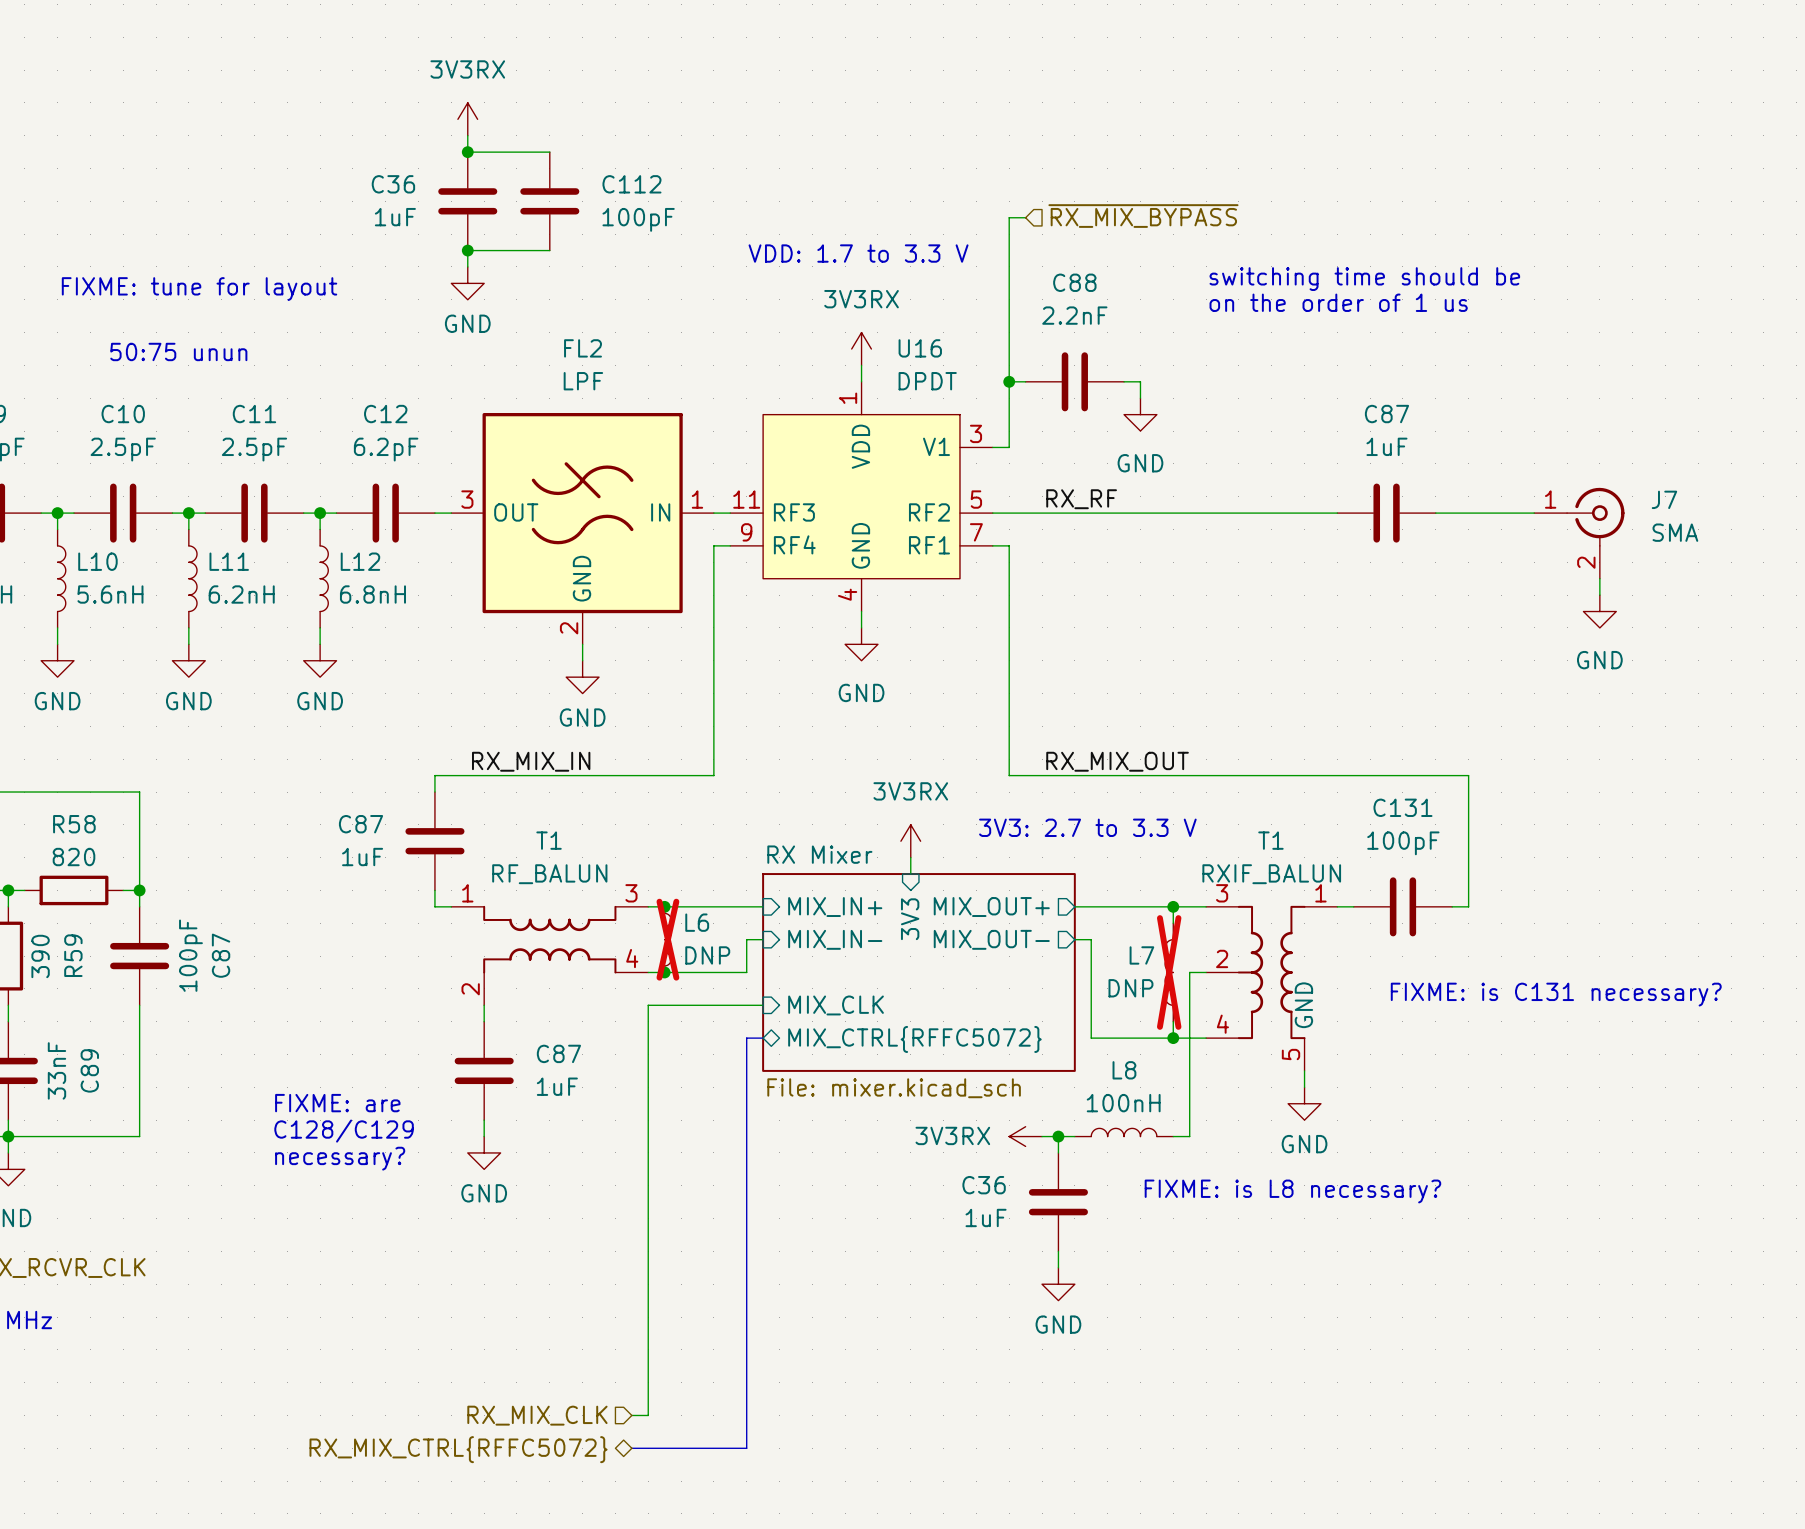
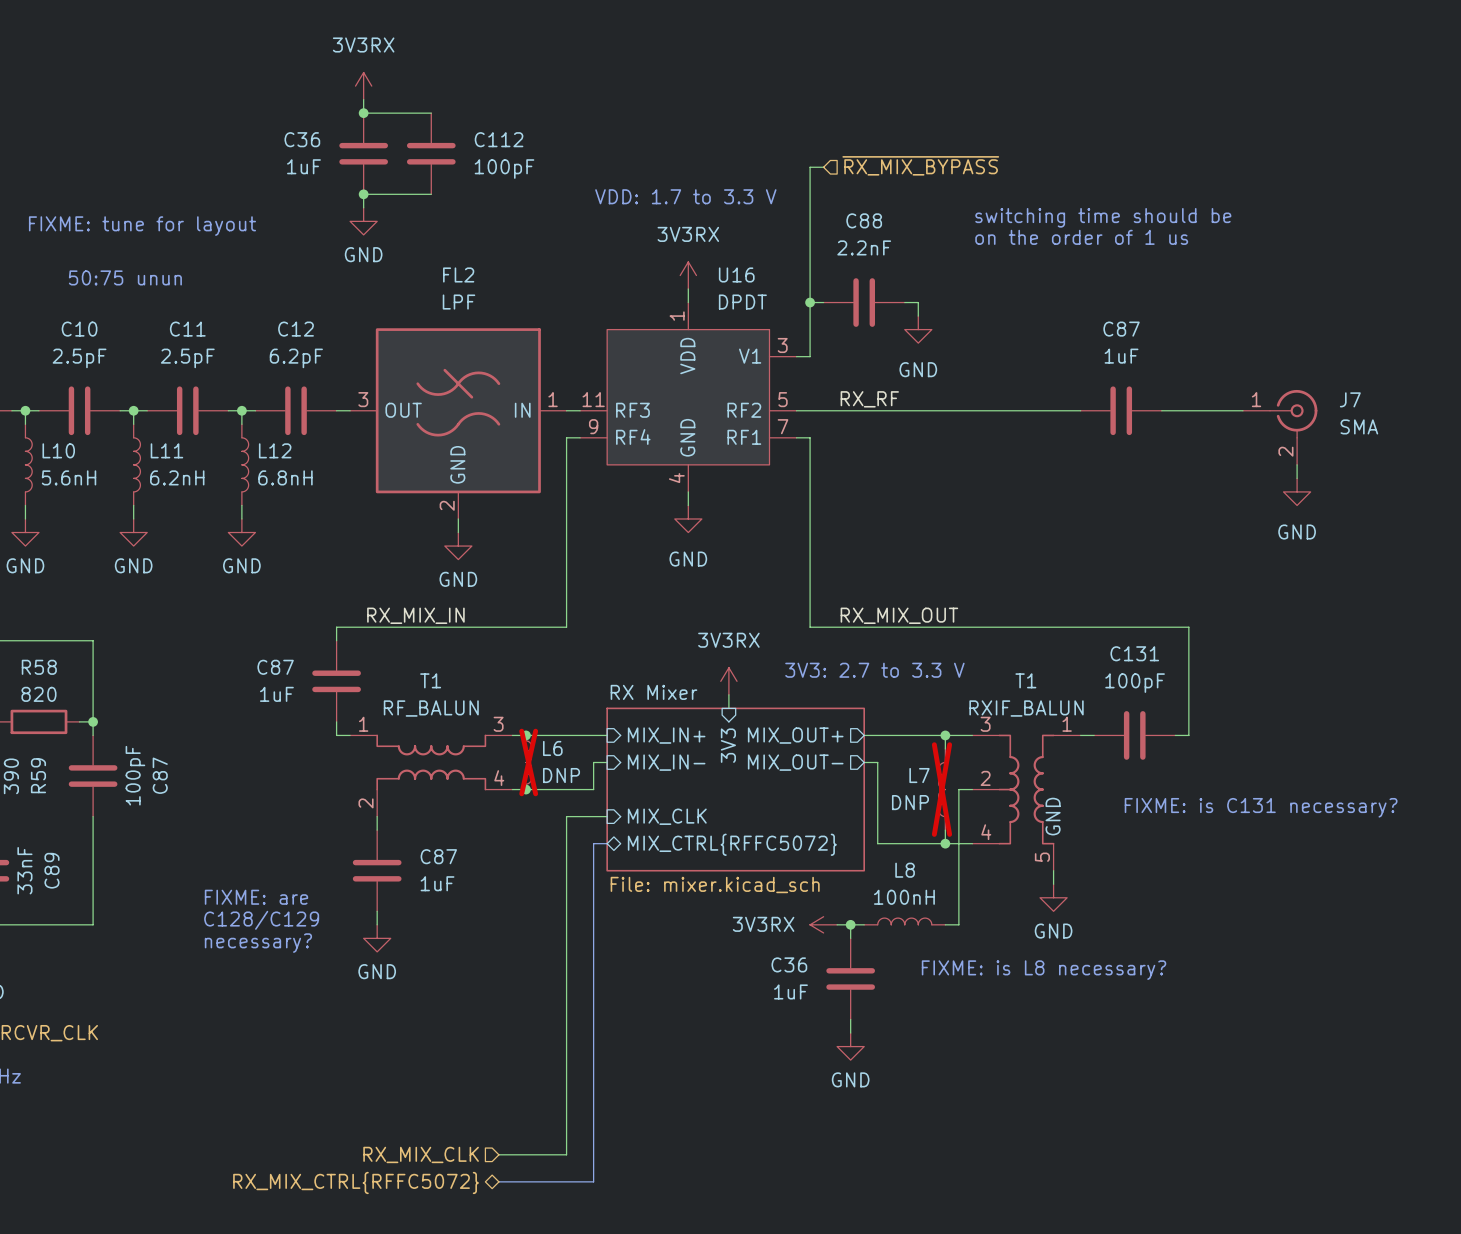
wire: (713, 1005) (648, 1005) (648, 1415) -> (566, 816) (566, 1154) (512, 1154)

